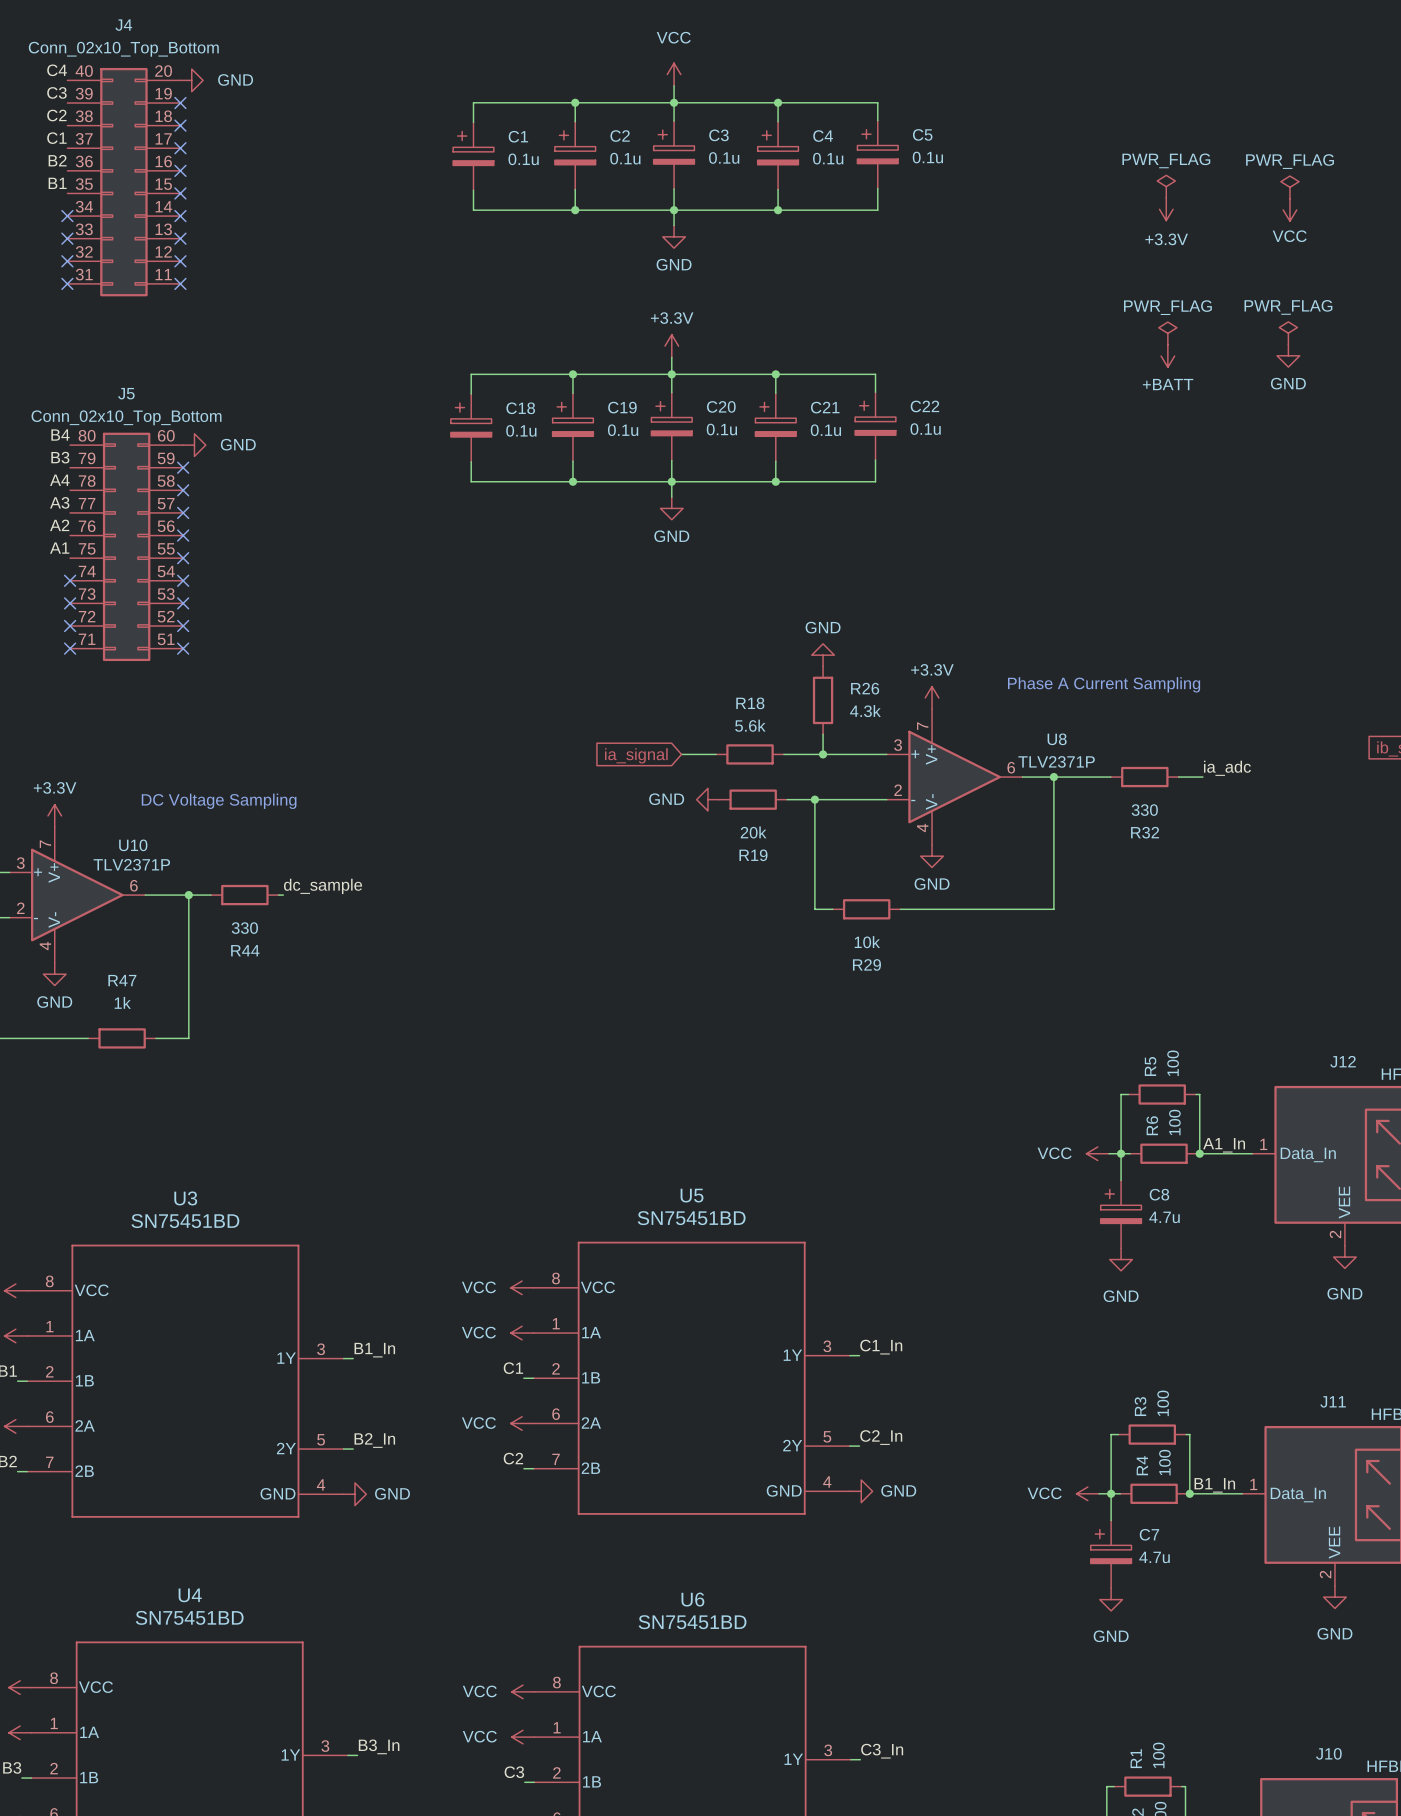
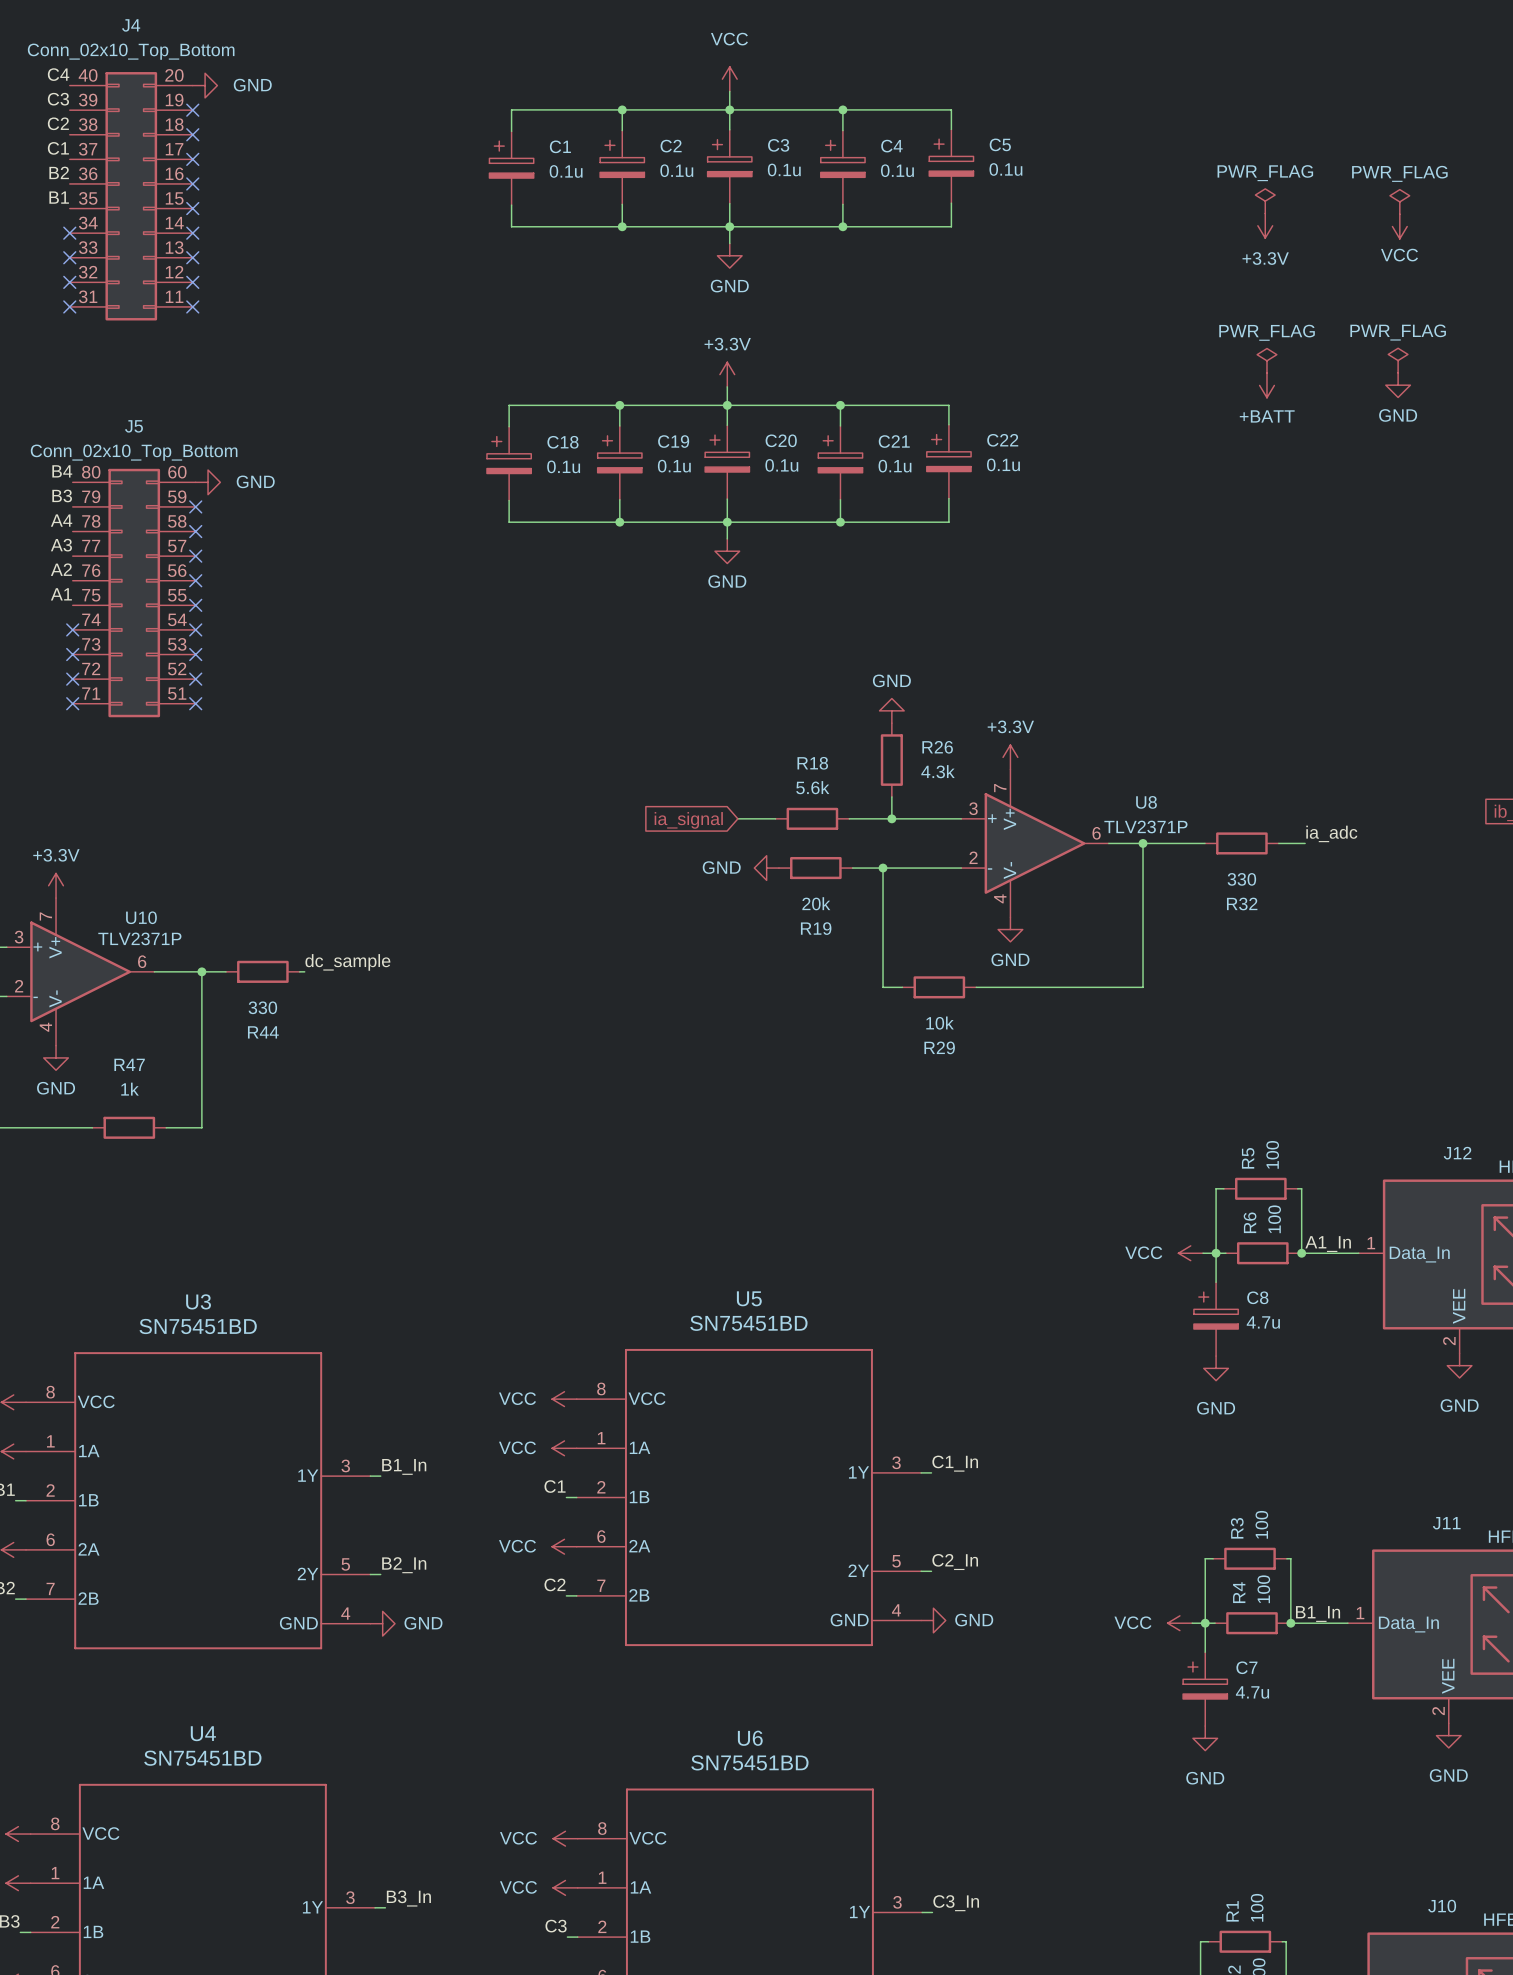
text: Phase A Current Sampling (1104, 684) -> none
text: DC Voltage Sampling (219, 801) -> none

